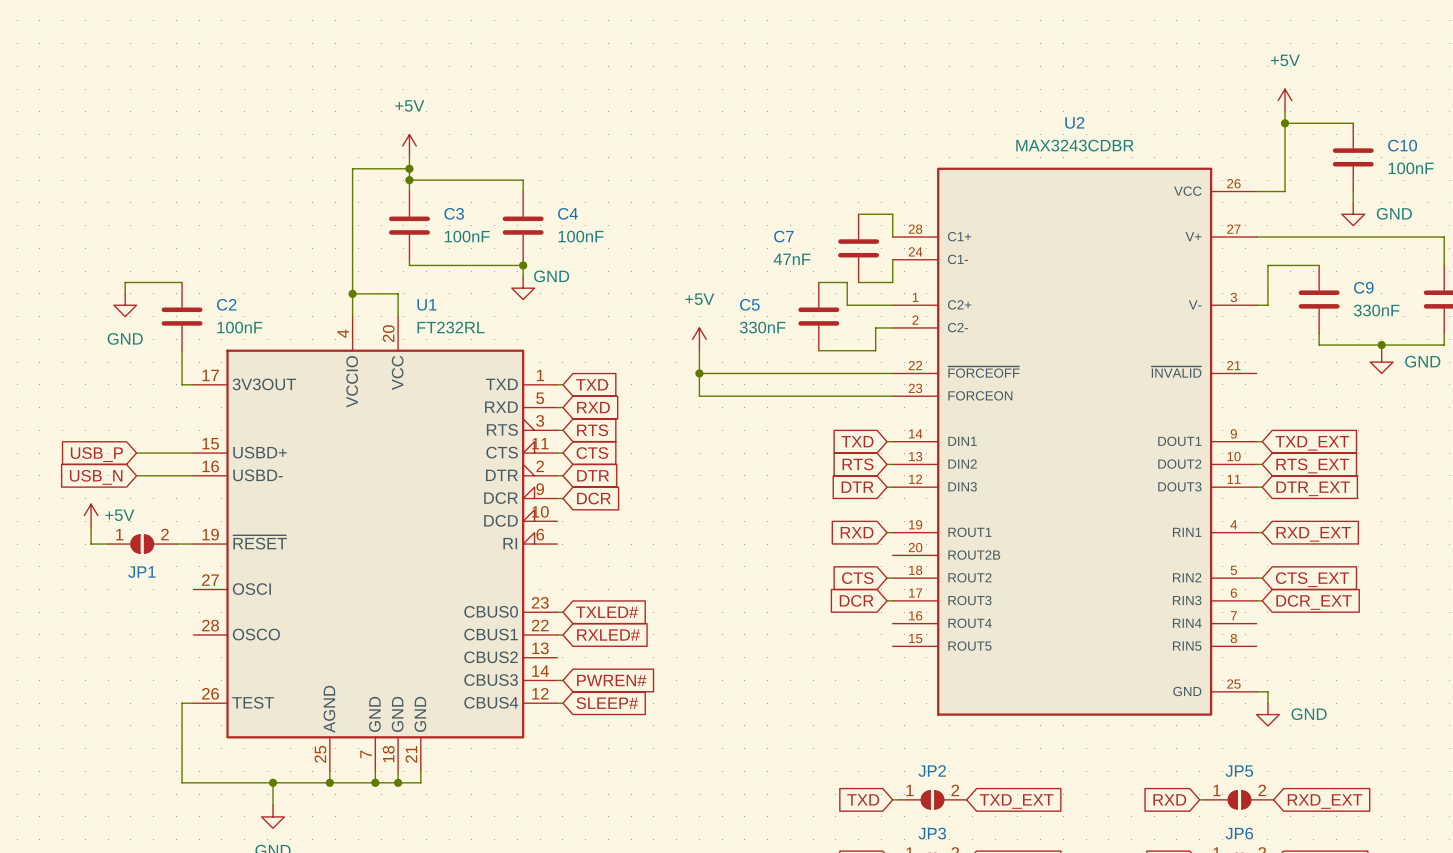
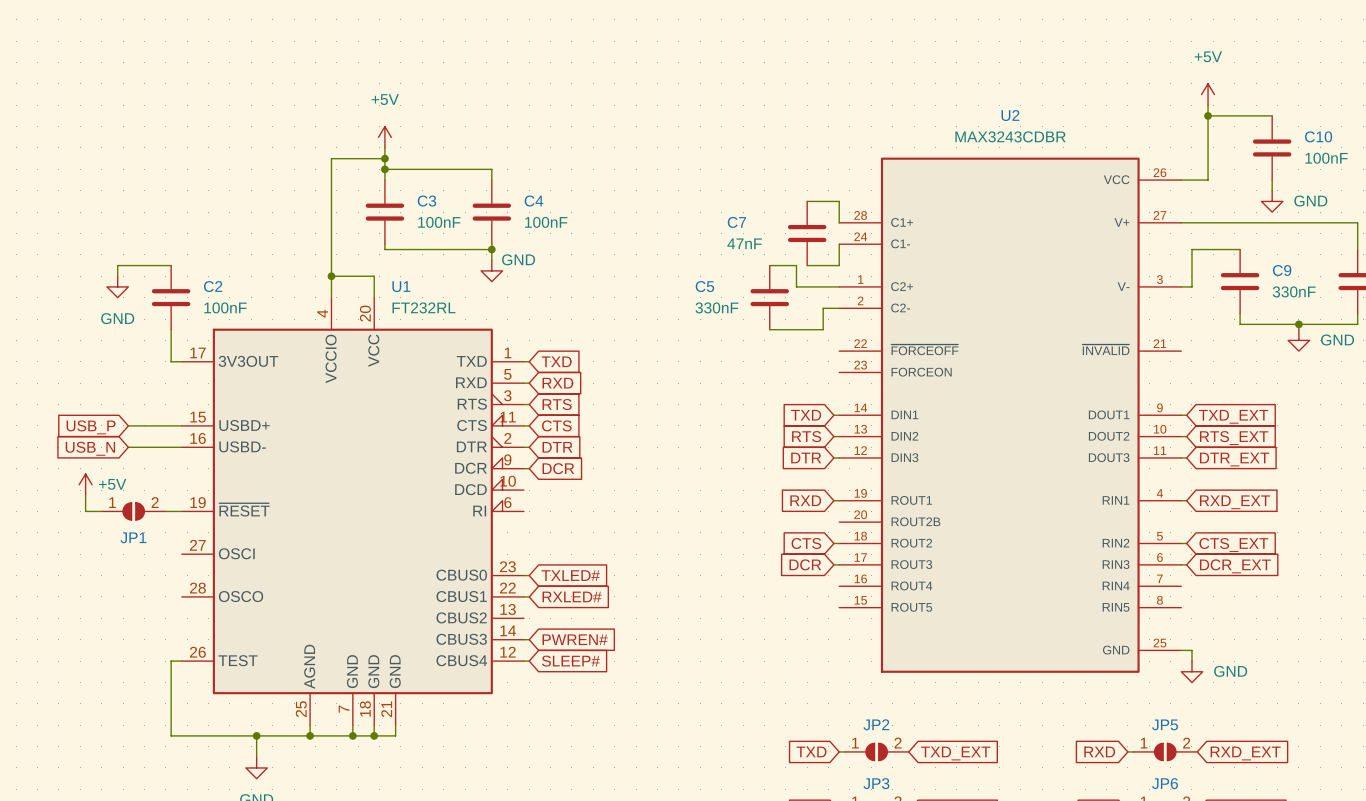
power symbol: +5V (699, 339) -> none
wire: (699, 350) (699, 396) (892, 396) -> none
wire: (699, 373) (892, 373) -> none
junction: (699, 373) -> none

